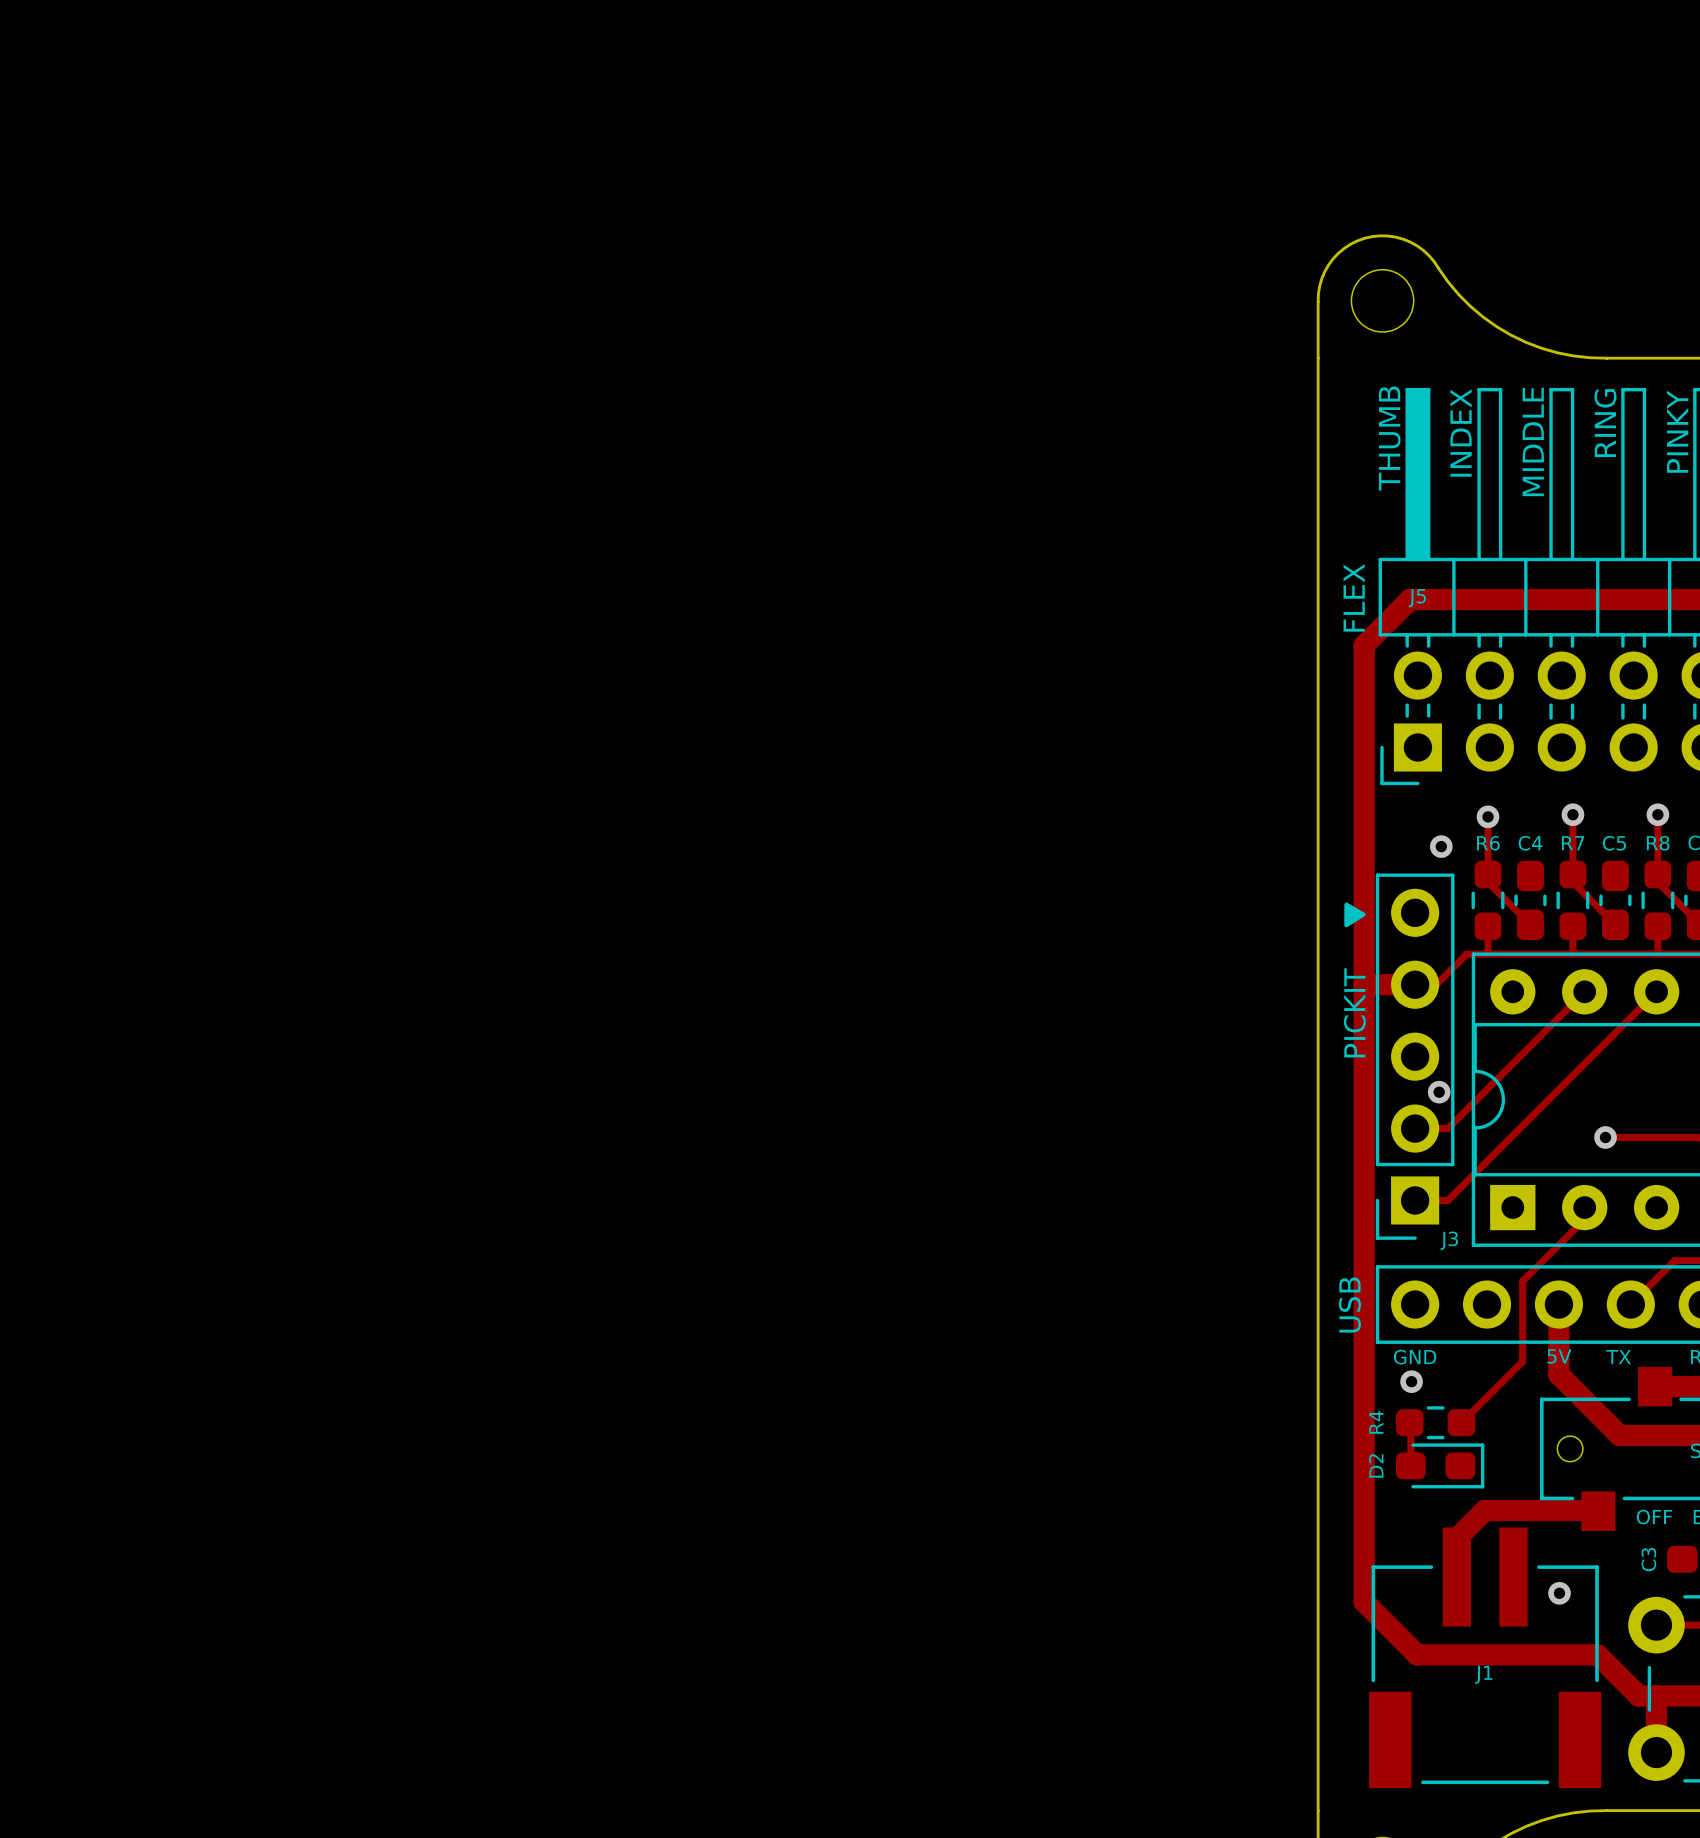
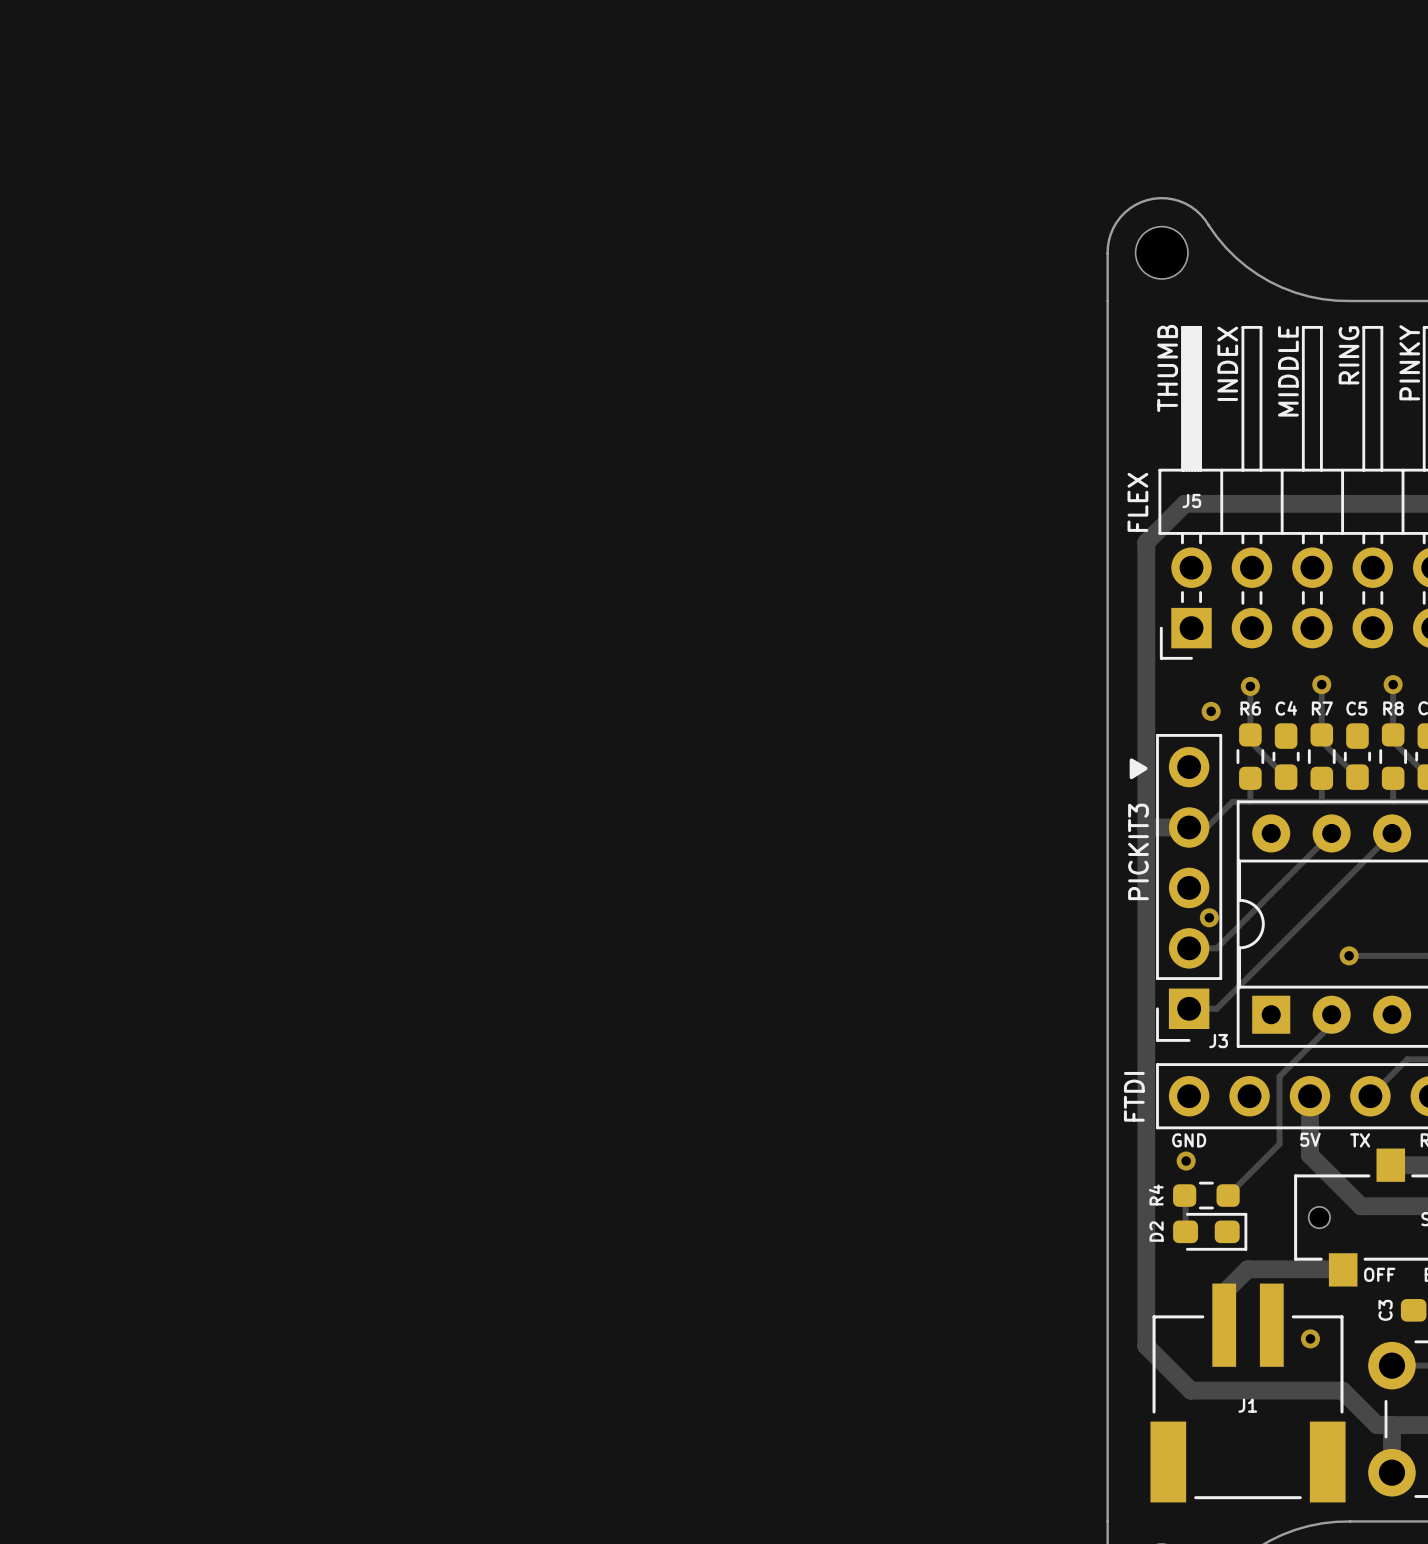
text: PICKIT (1354, 1012) -> PICKIT3 (1138, 851)
text: USB (1349, 1305) -> FTDI (1134, 1096)

